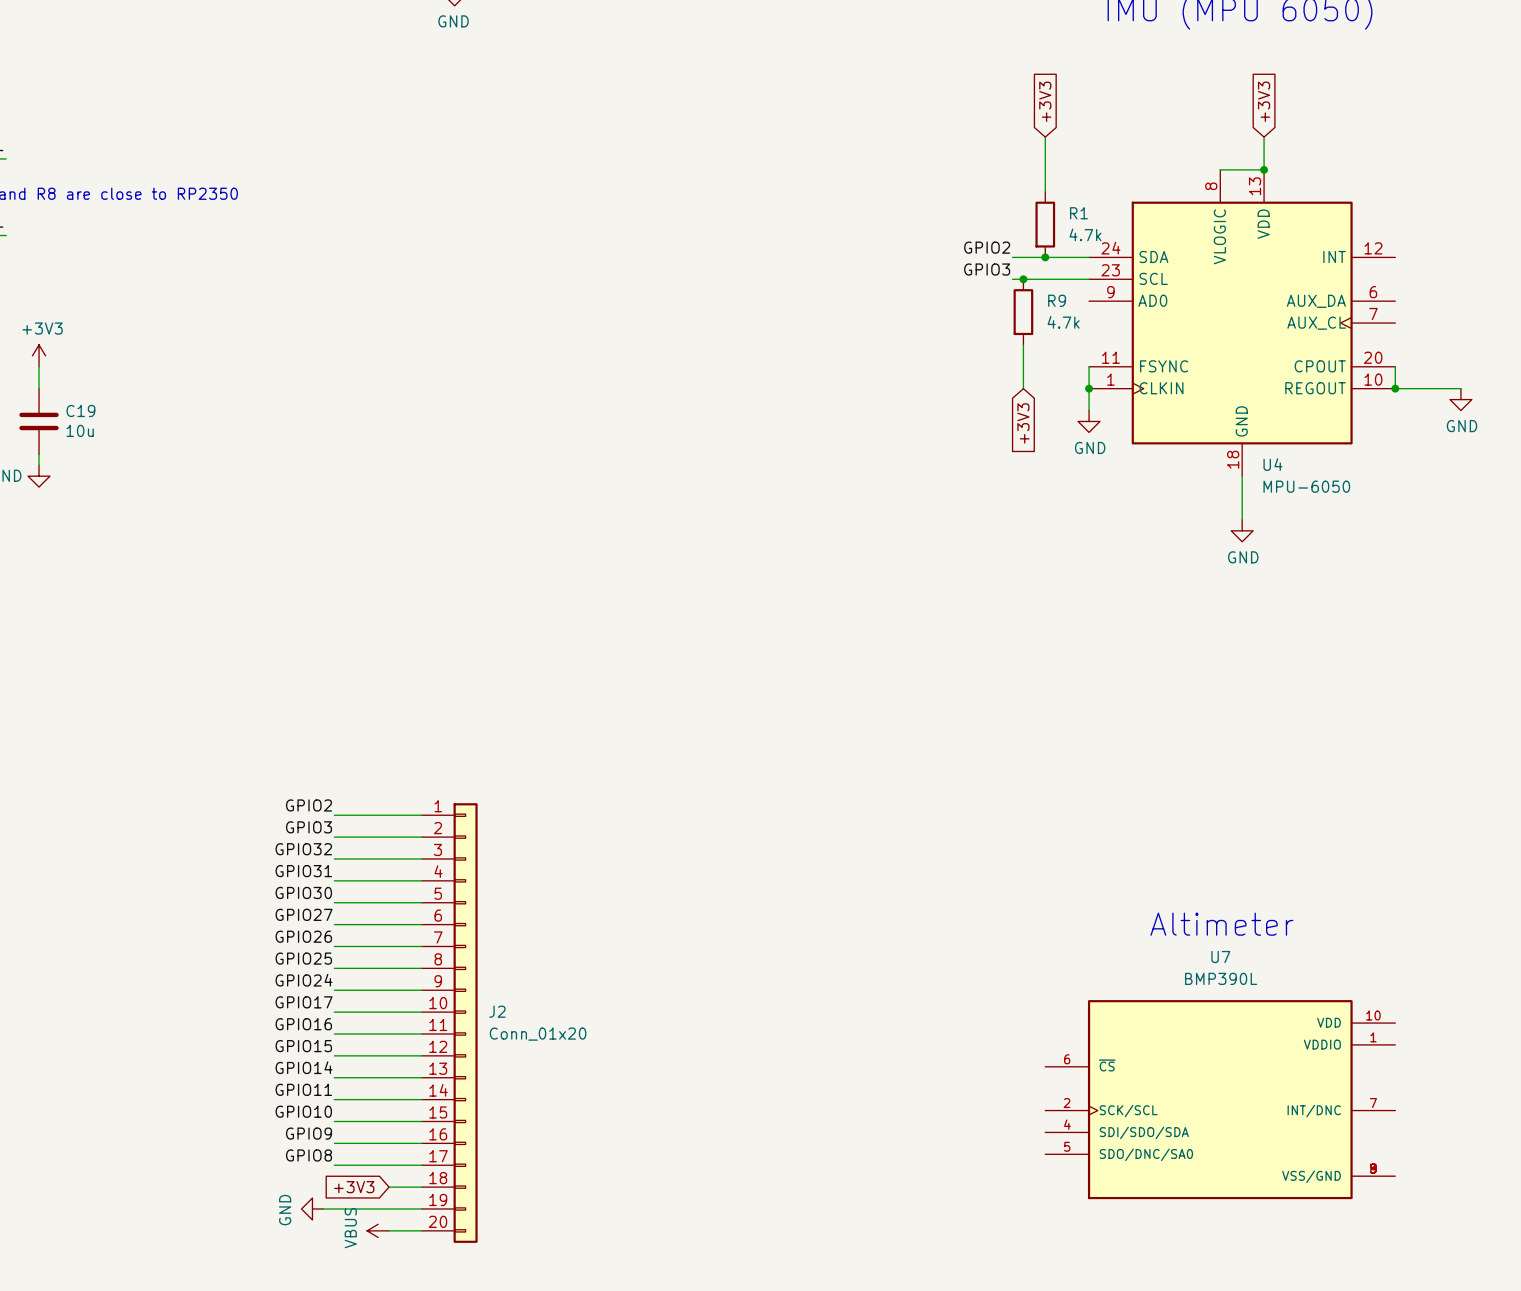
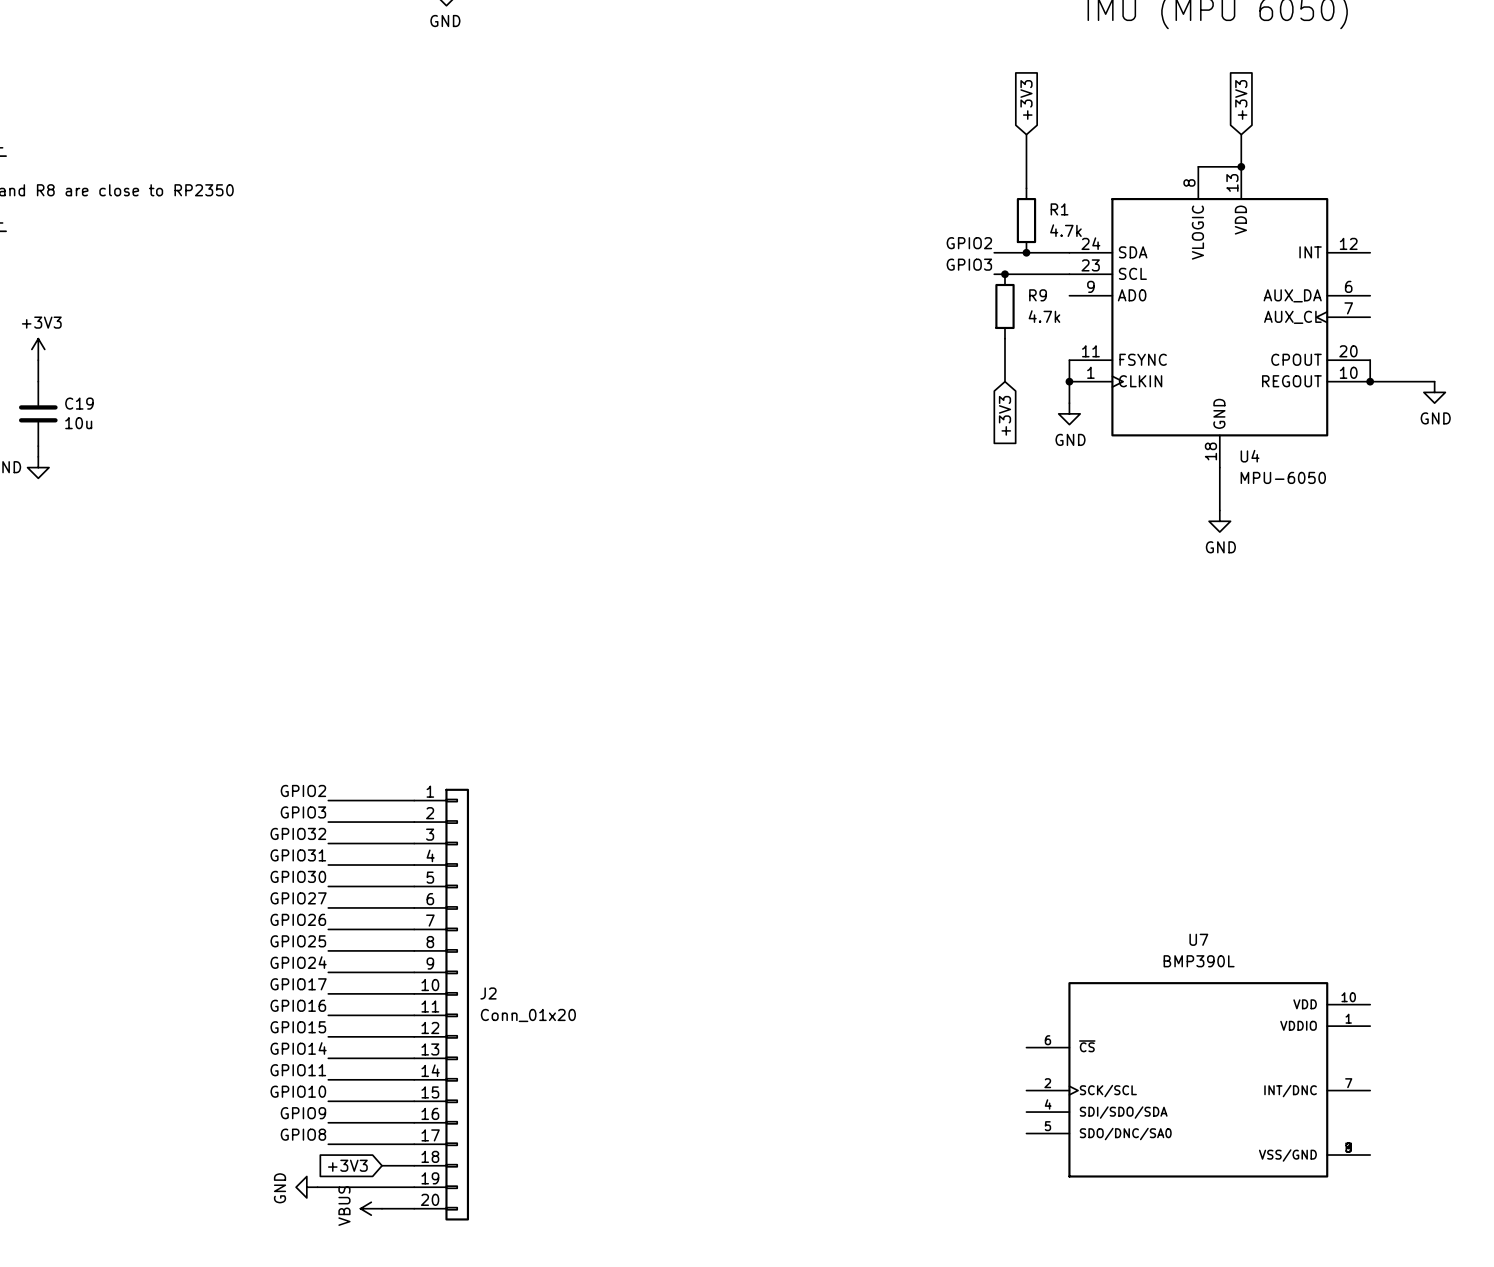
text: Altimeter (1221, 924) -> none

